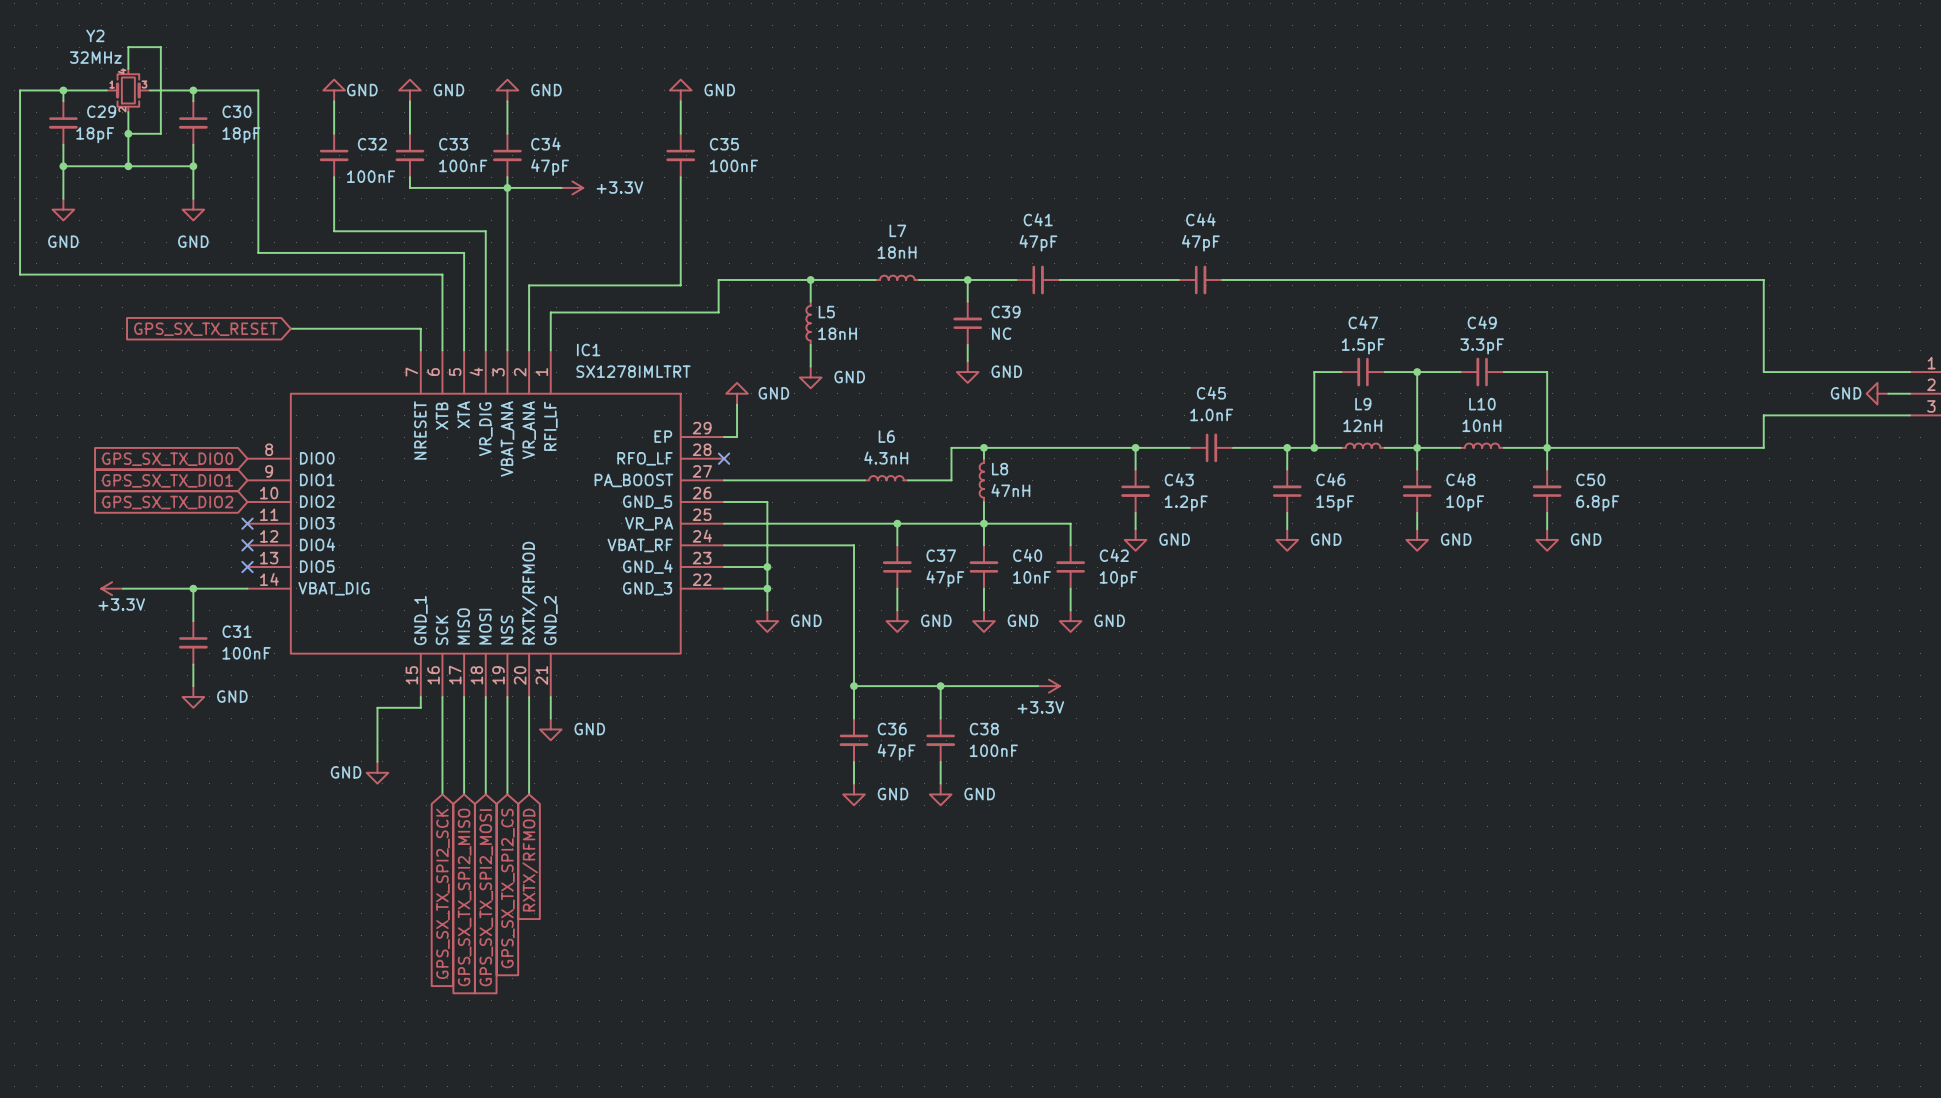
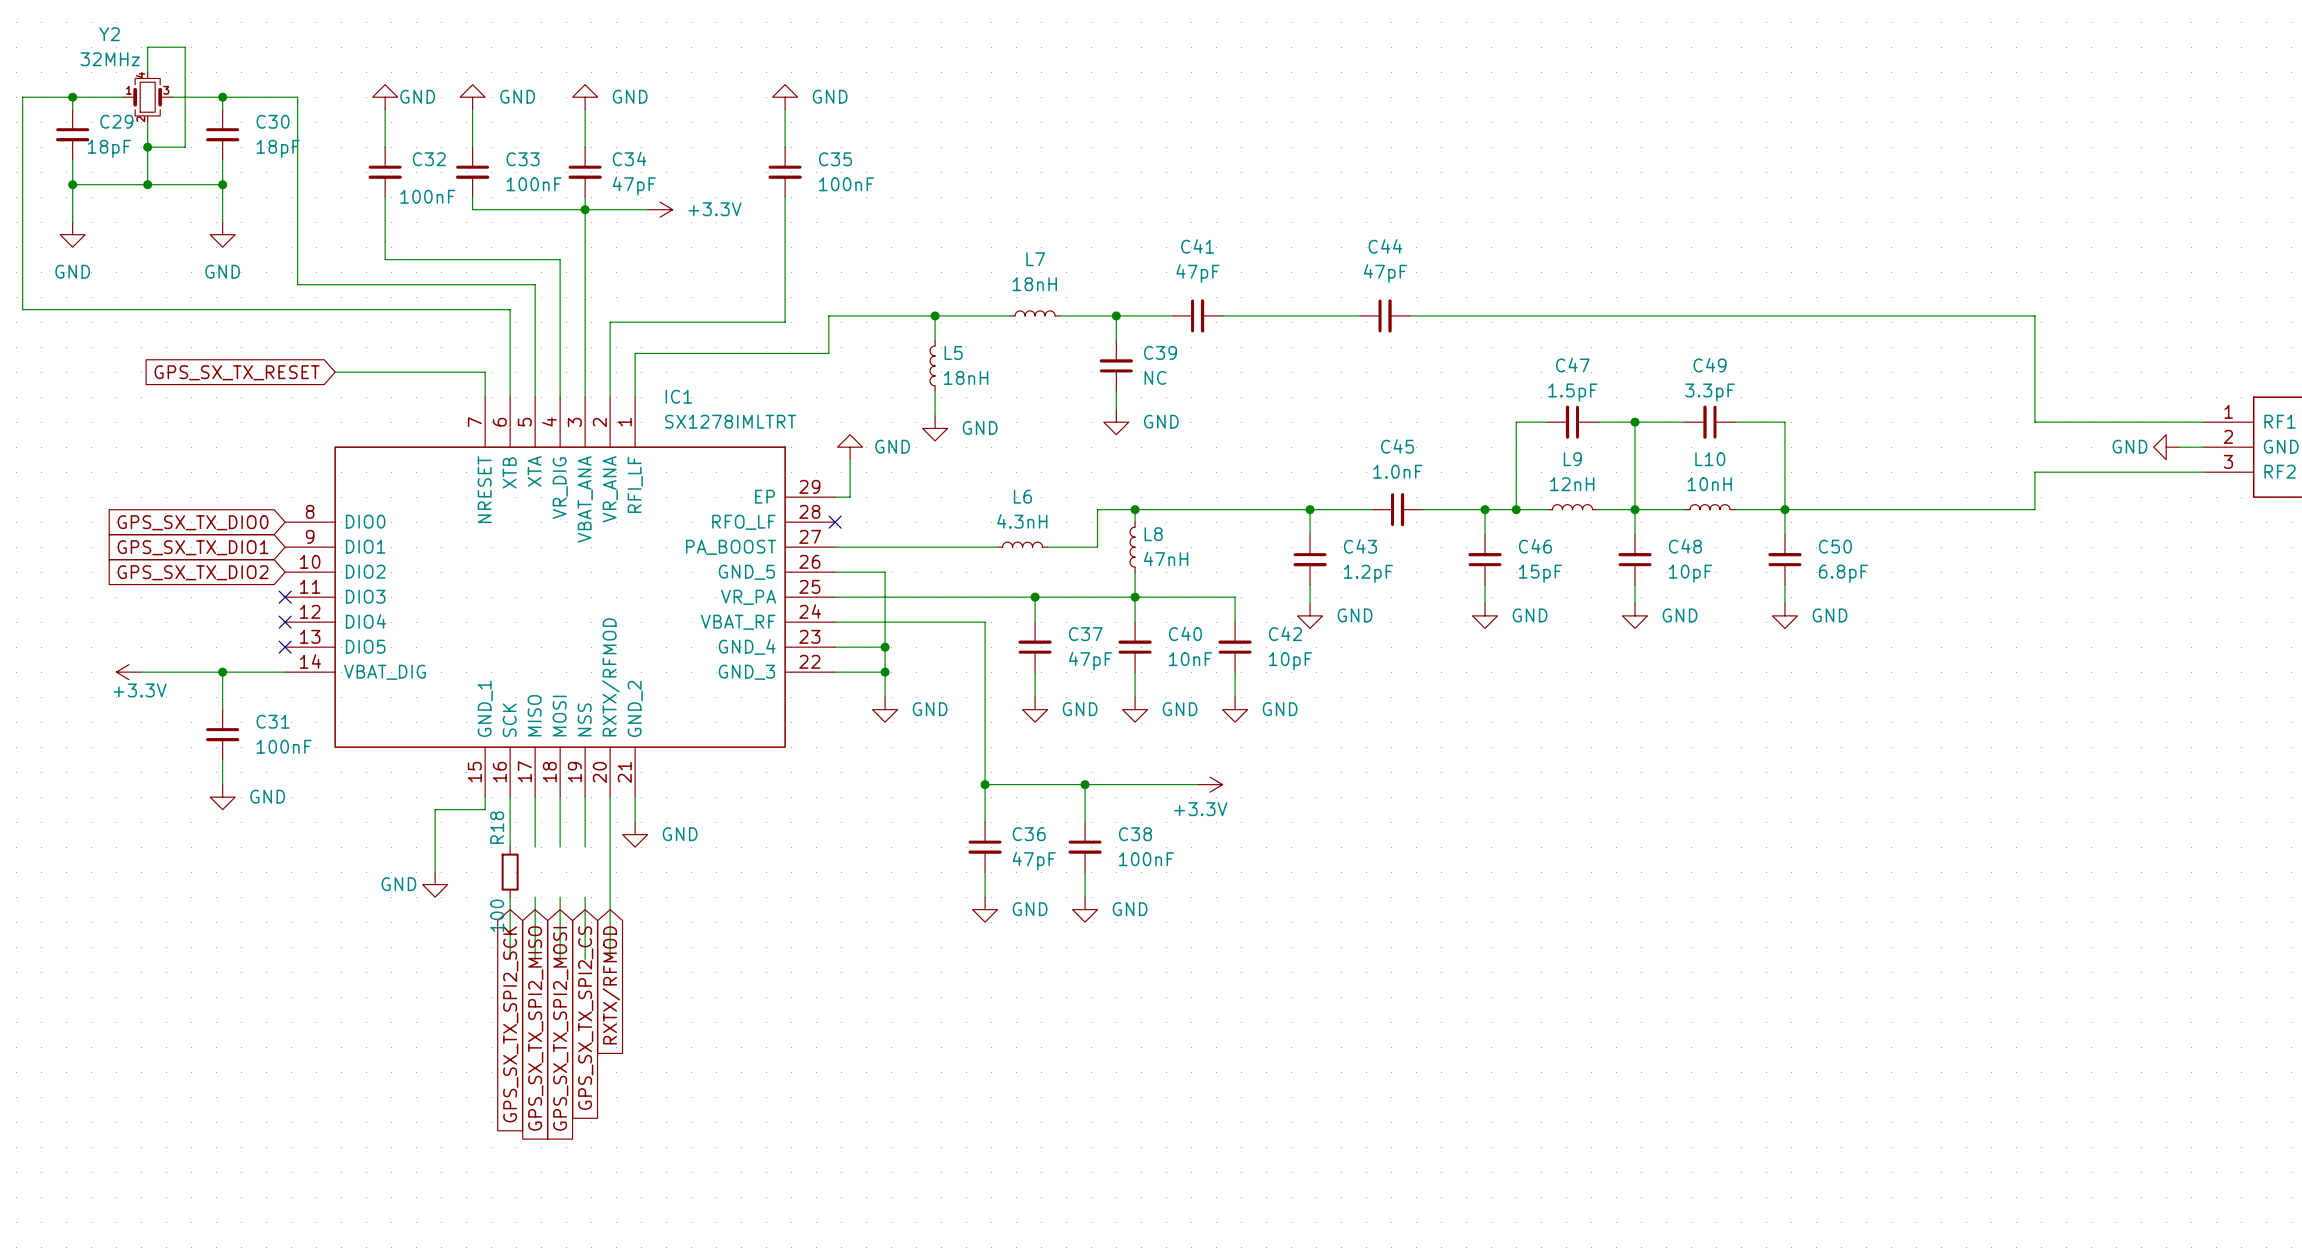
wire: (442, 740) (442, 783) -> (510, 909) (510, 959)
wire: (464, 740) (464, 783) -> (535, 909) (535, 959)
wire: (485, 740) (485, 783) -> (560, 909) (560, 959)
wire: (507, 740) (507, 783) -> (585, 909) (585, 959)
R18: none -> 100 (510, 872)
wire: none -> (610, 909) (610, 959)

